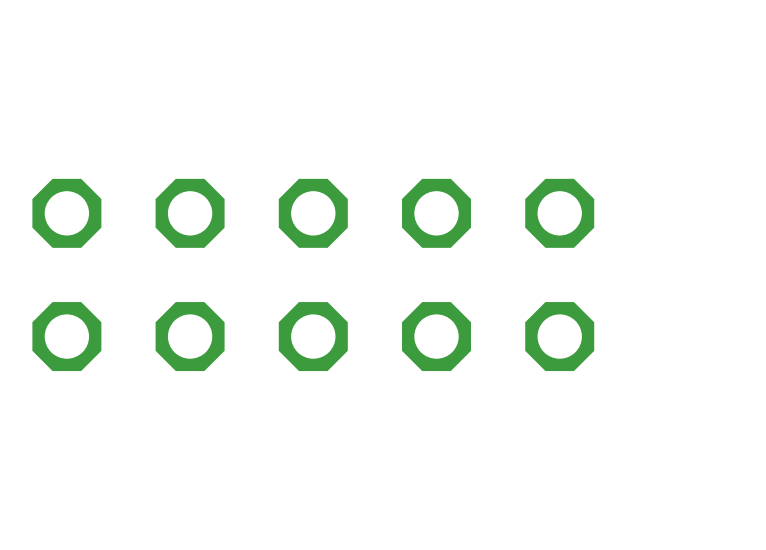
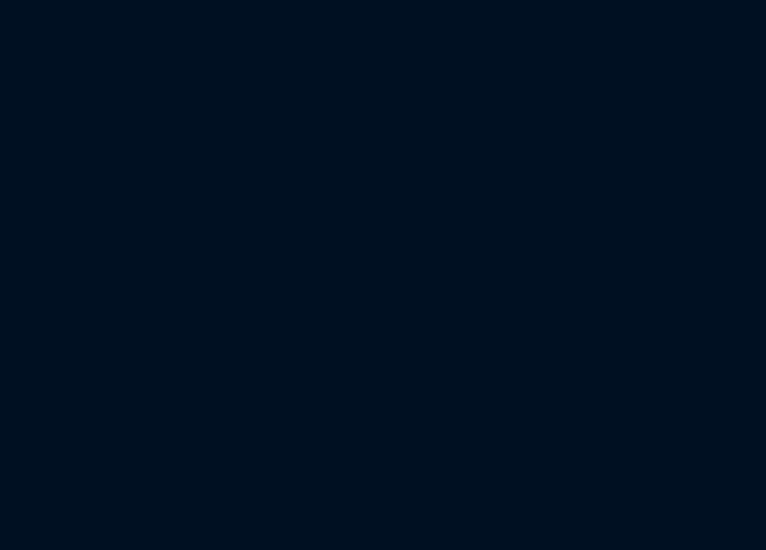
part: (313, 274) -> none

